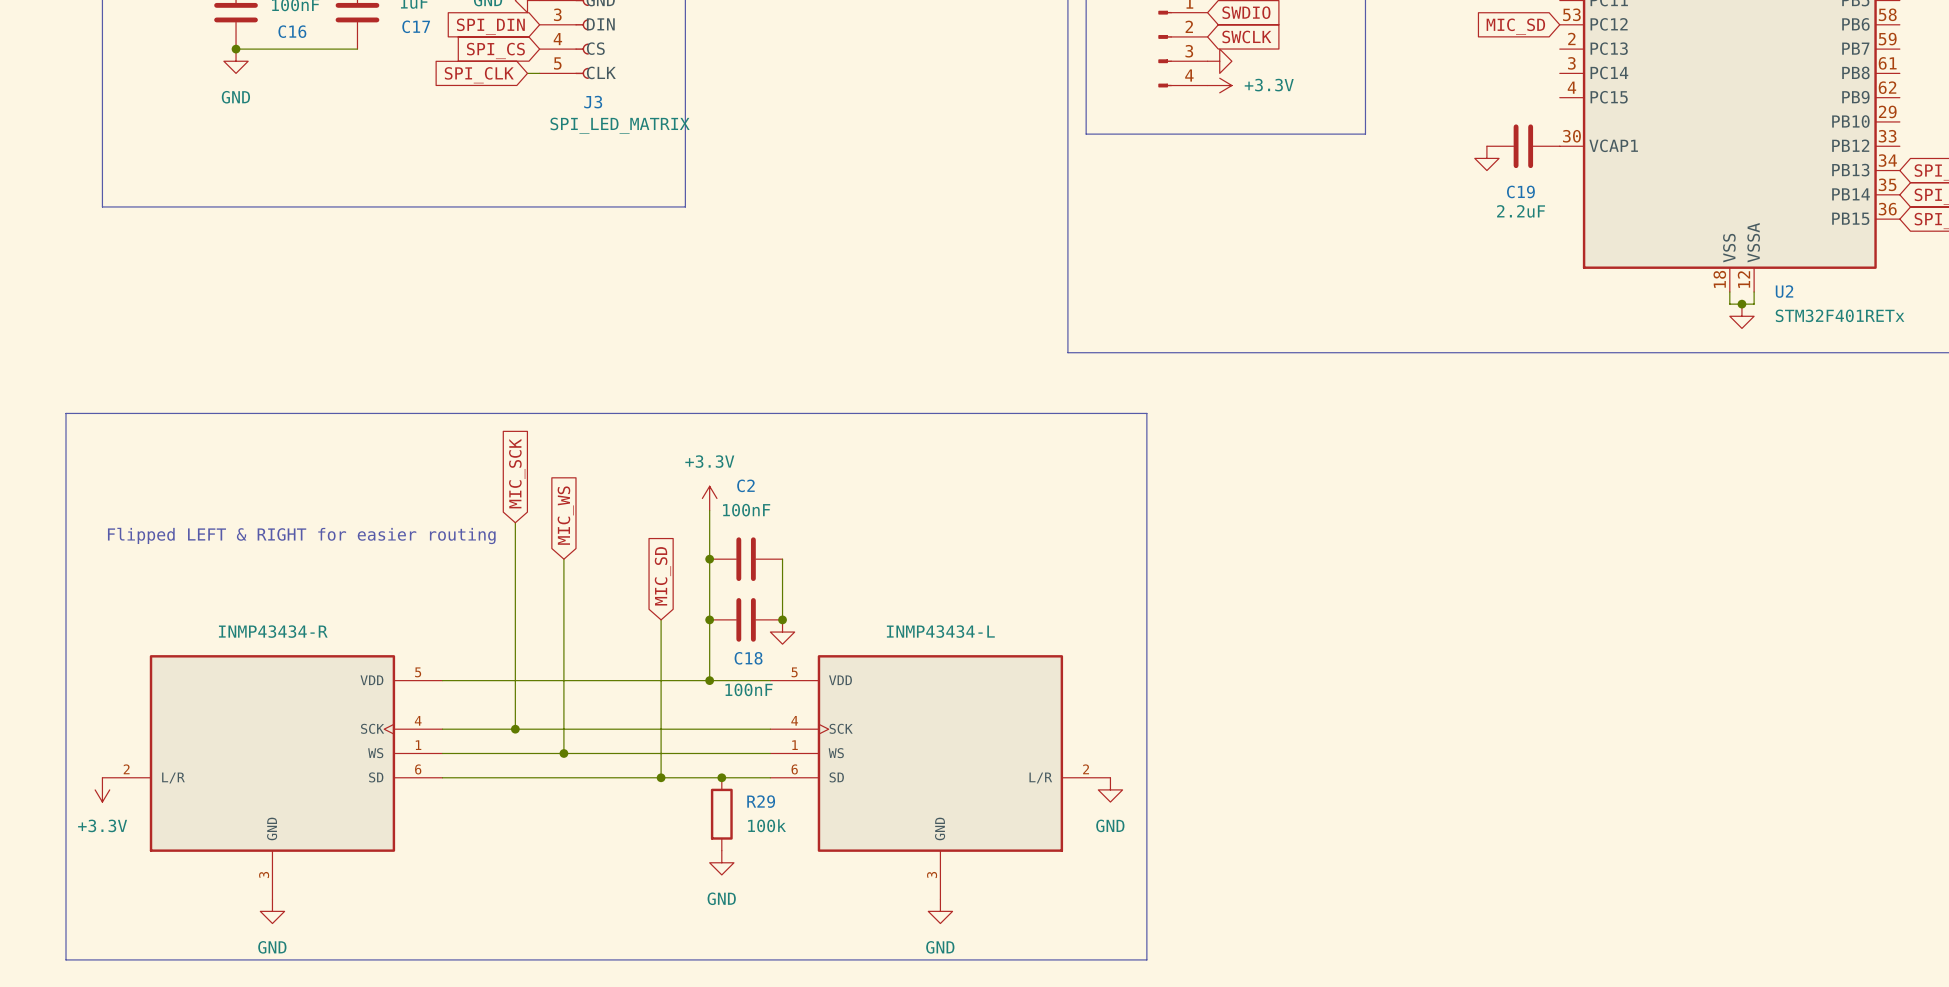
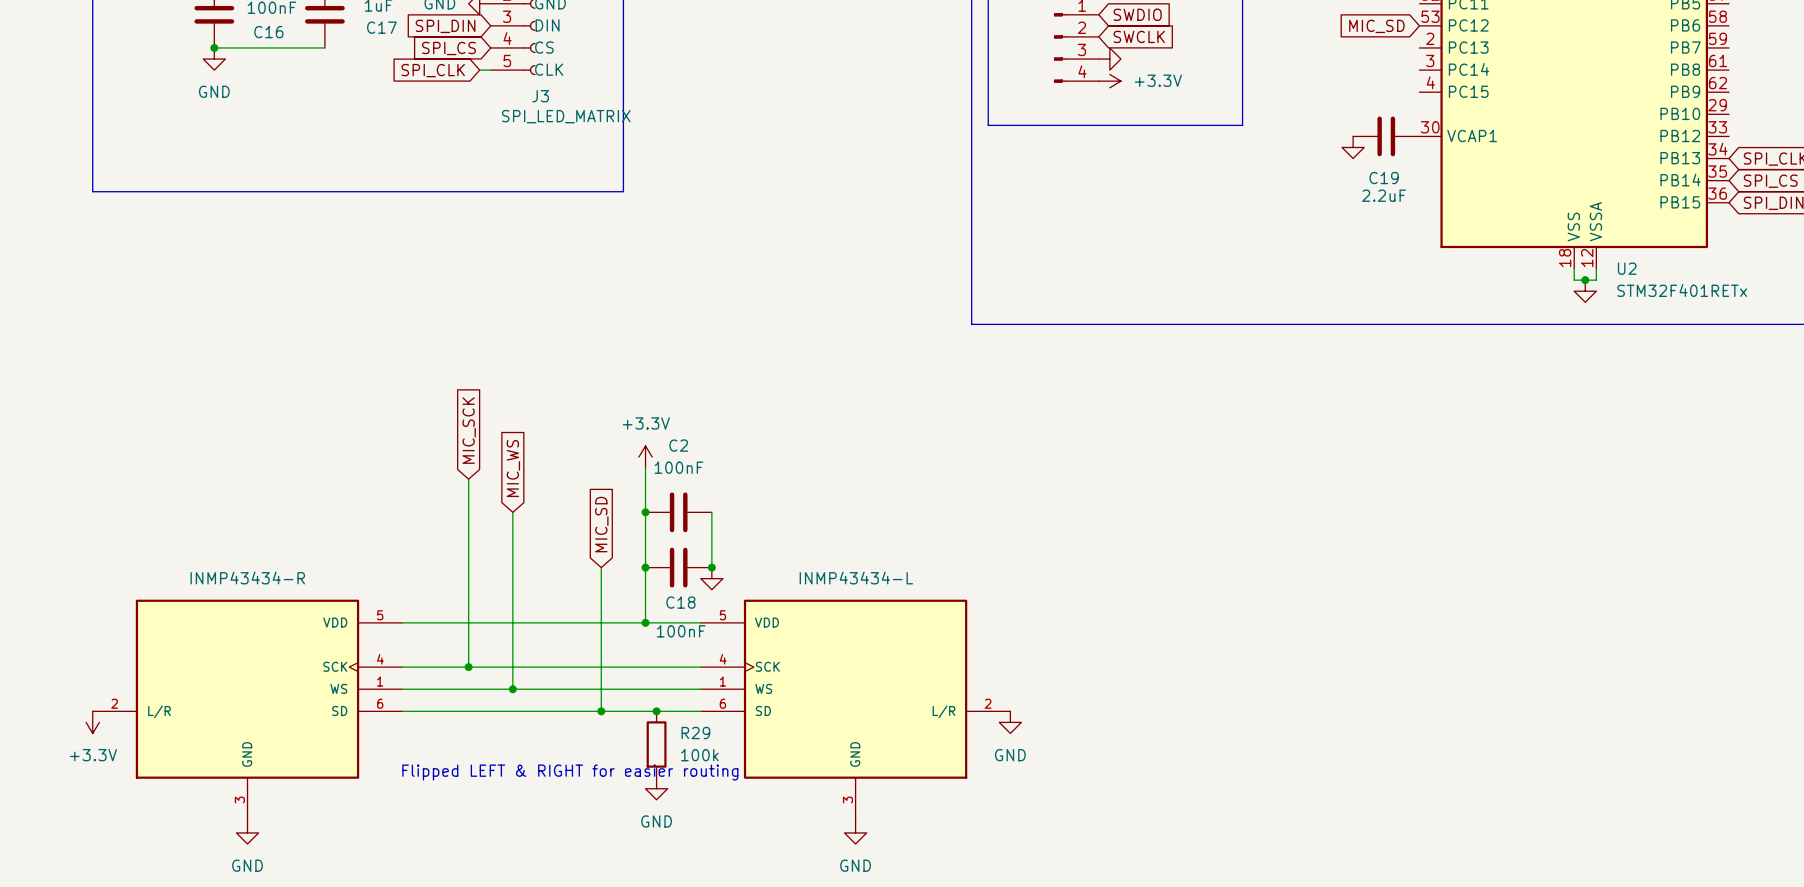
line: (66, 413) (1146, 413) (1146, 959) (66, 959) (66, 413) -> none
text: Flipped LEFT & RIGHT for easier routing (301, 535) -> none
text: none -> Flipped LEFT & RIGHT for easier routing (570, 772)

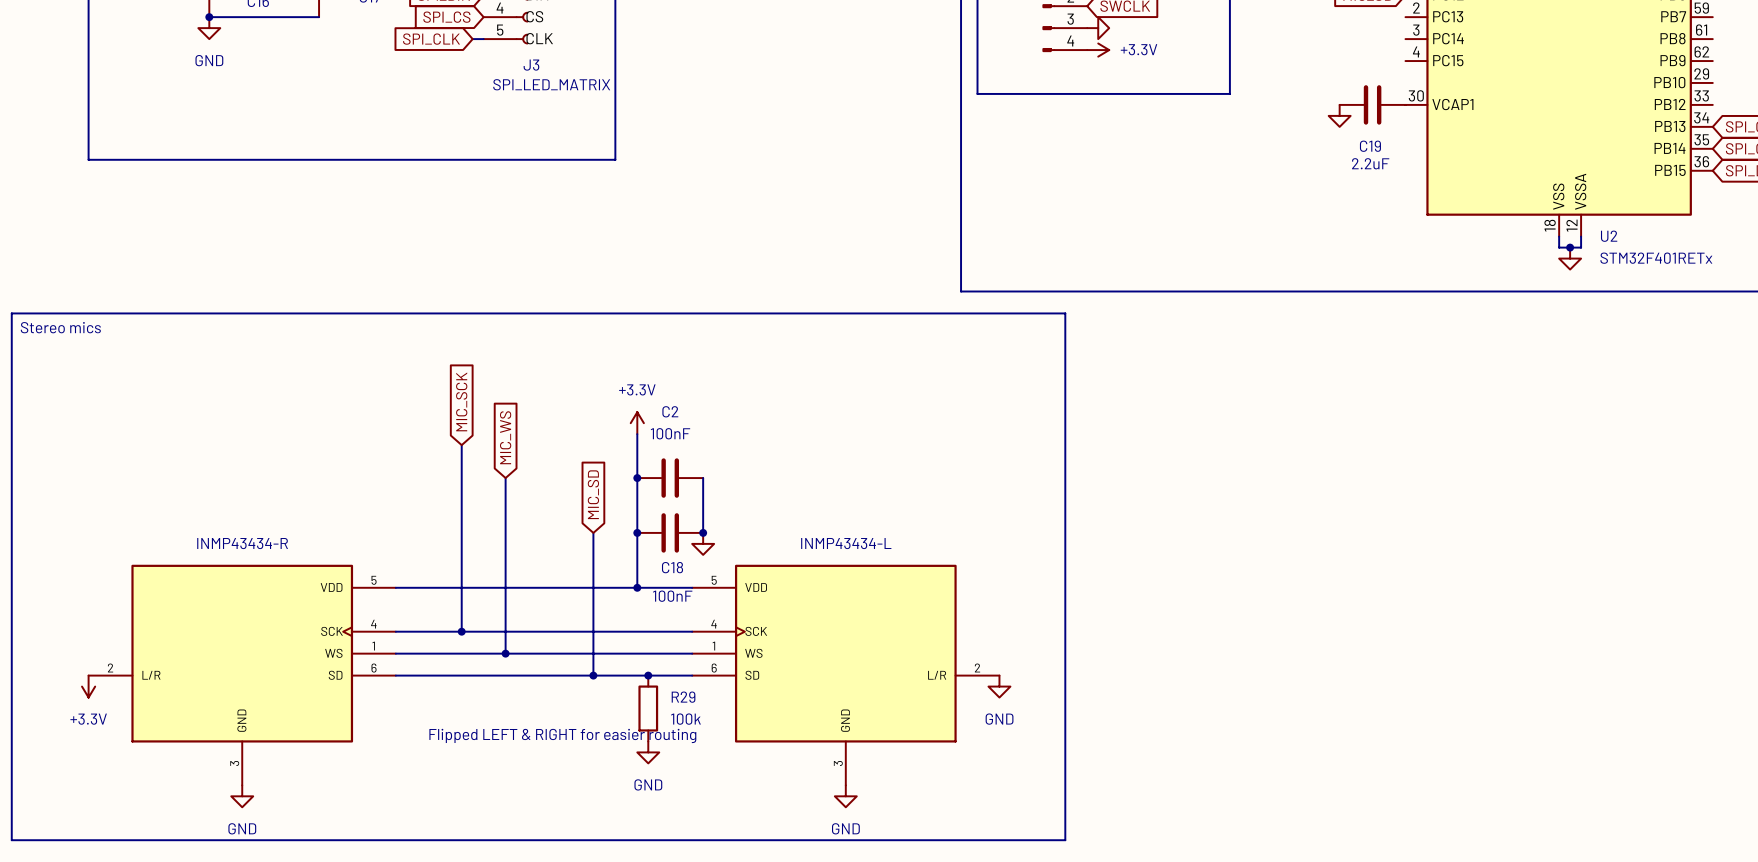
line: none -> (11, 313) (1065, 313) (1065, 840) (11, 840) (11, 313)
text: none -> Stereo mics (60, 327)

